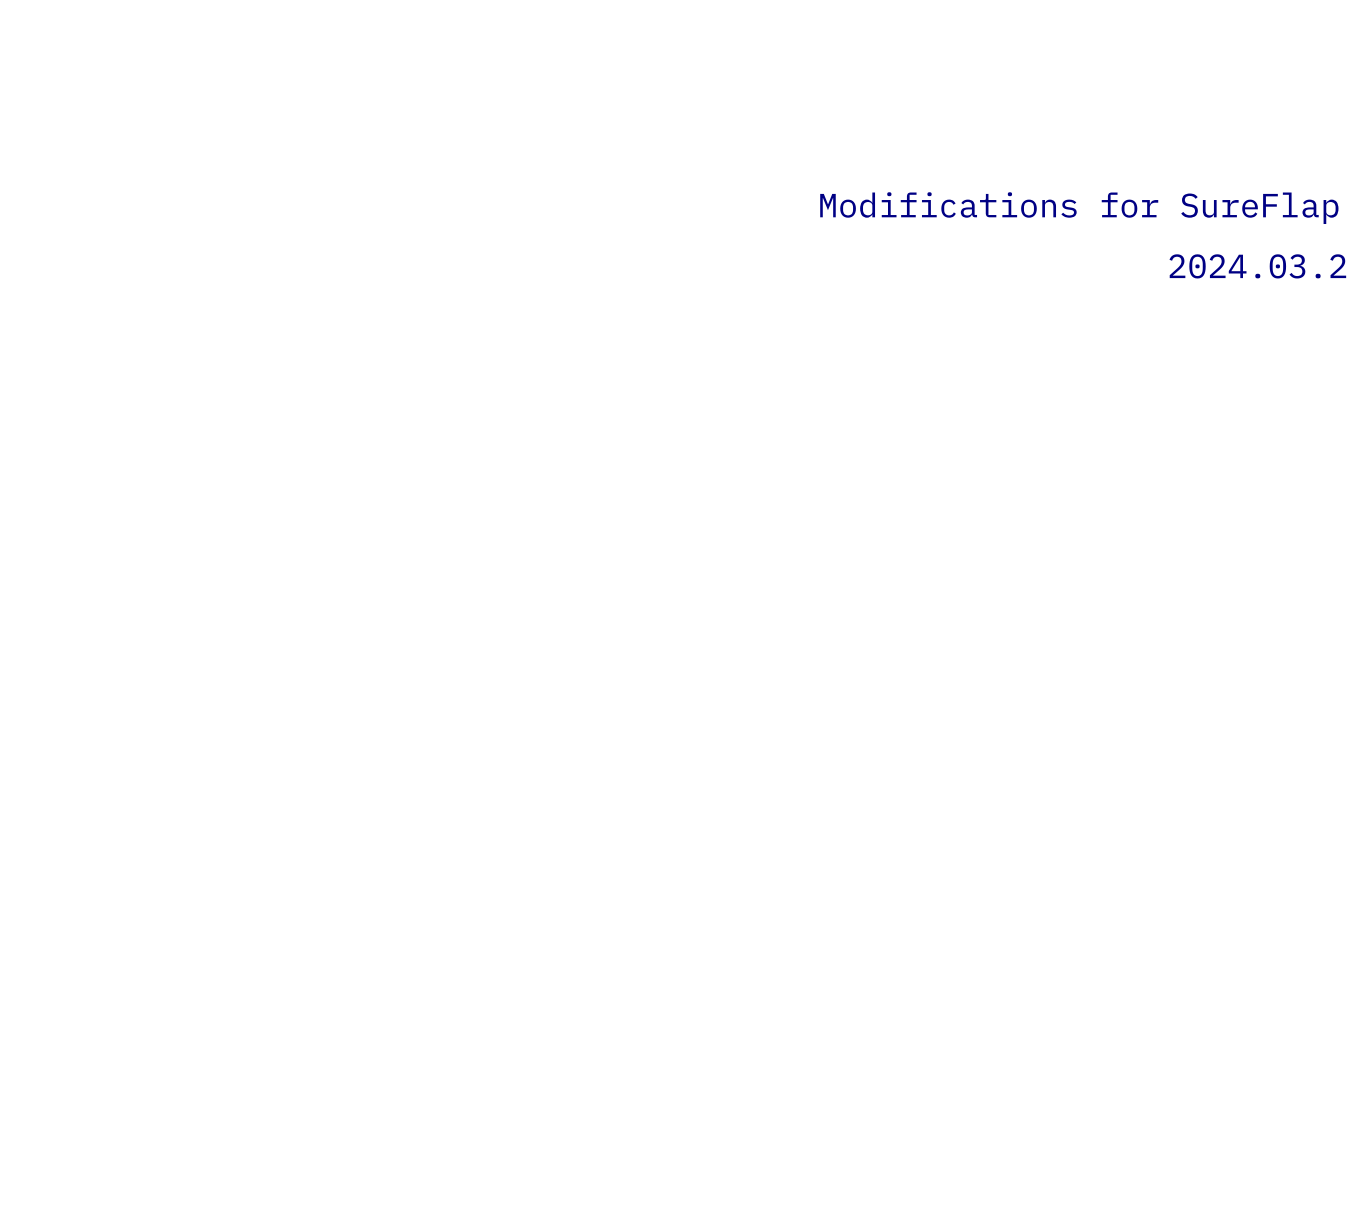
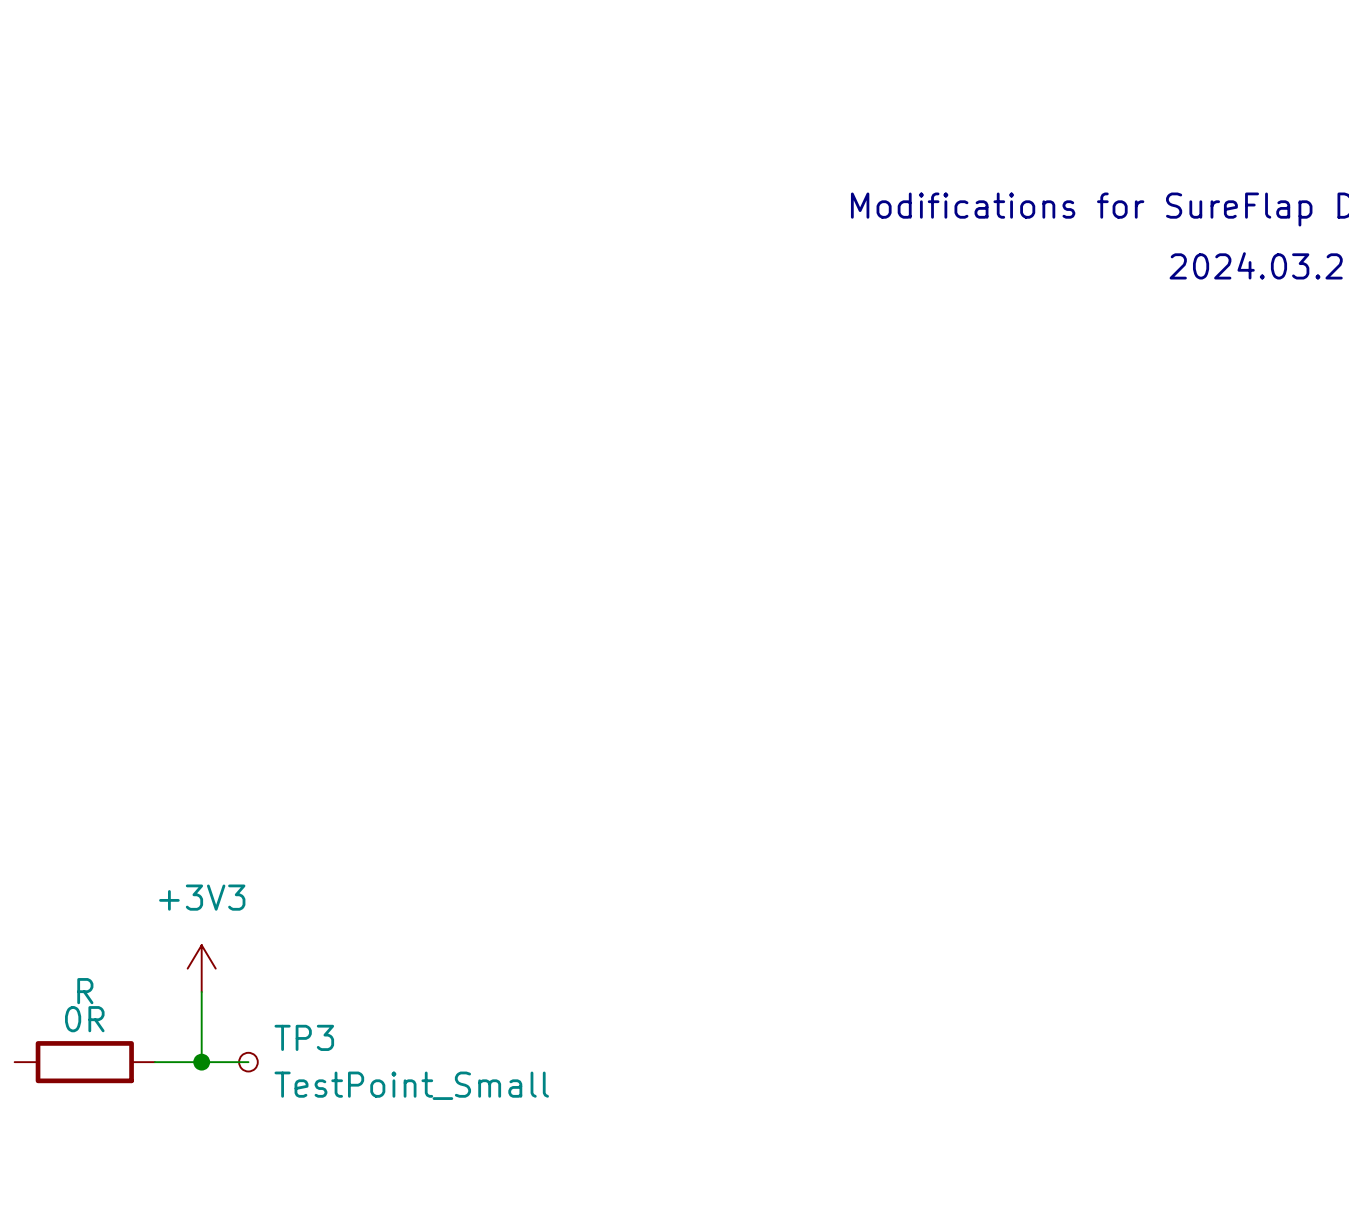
power symbol: none -> +3V3 (201, 968)
wire: none -> (201, 992) (201, 1062)
0R: none -> R (84, 1062)
wire: none -> (154, 1062) (248, 1062)
junction: none -> (201, 1062)
TP3: none -> TestPoint_Small (248, 1062)

